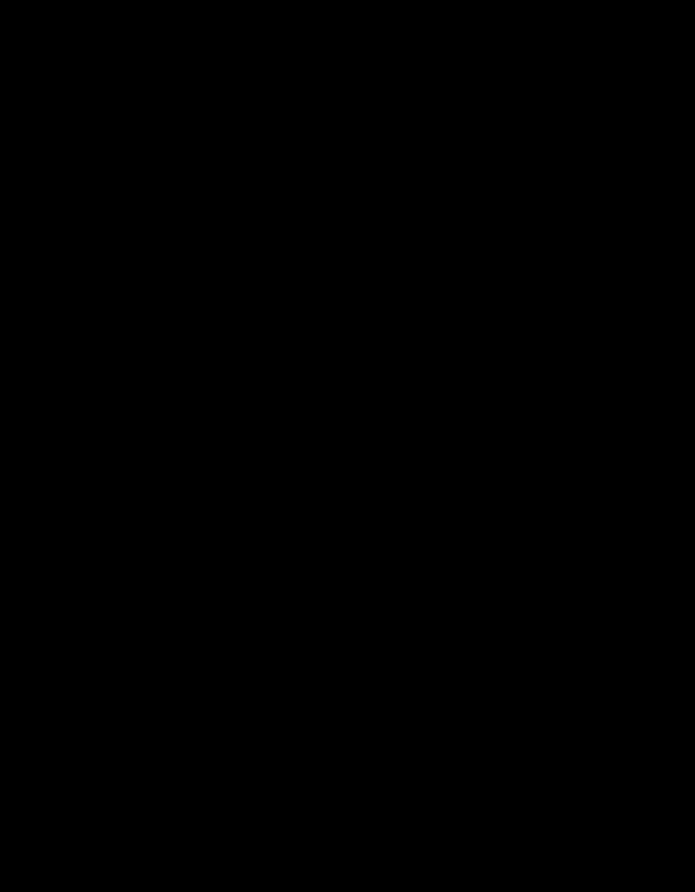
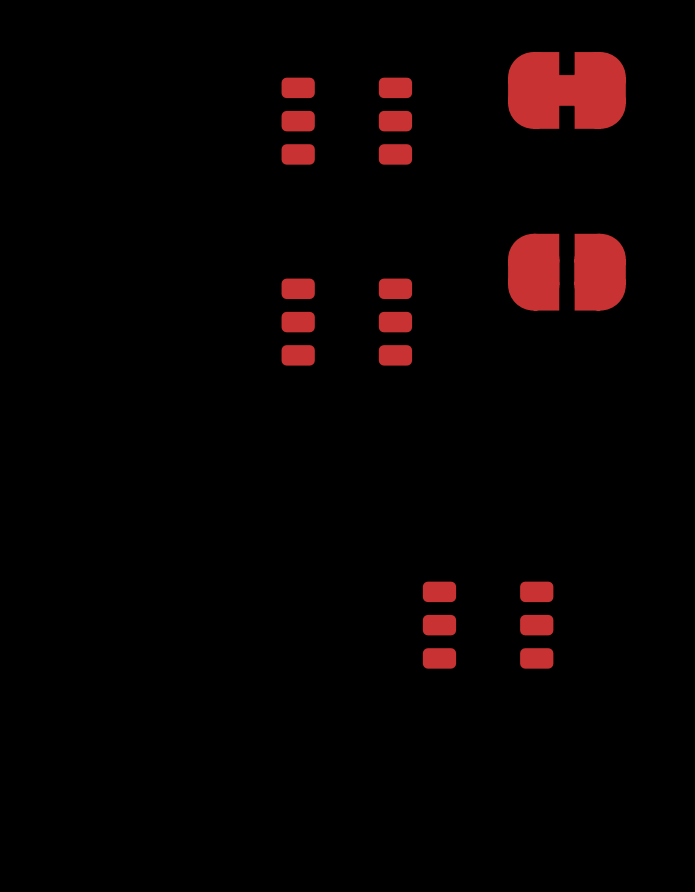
part: none -> (566, 90)
part: none -> (346, 121)
part: none -> (566, 272)
part: none -> (346, 322)
part: none -> (488, 625)

